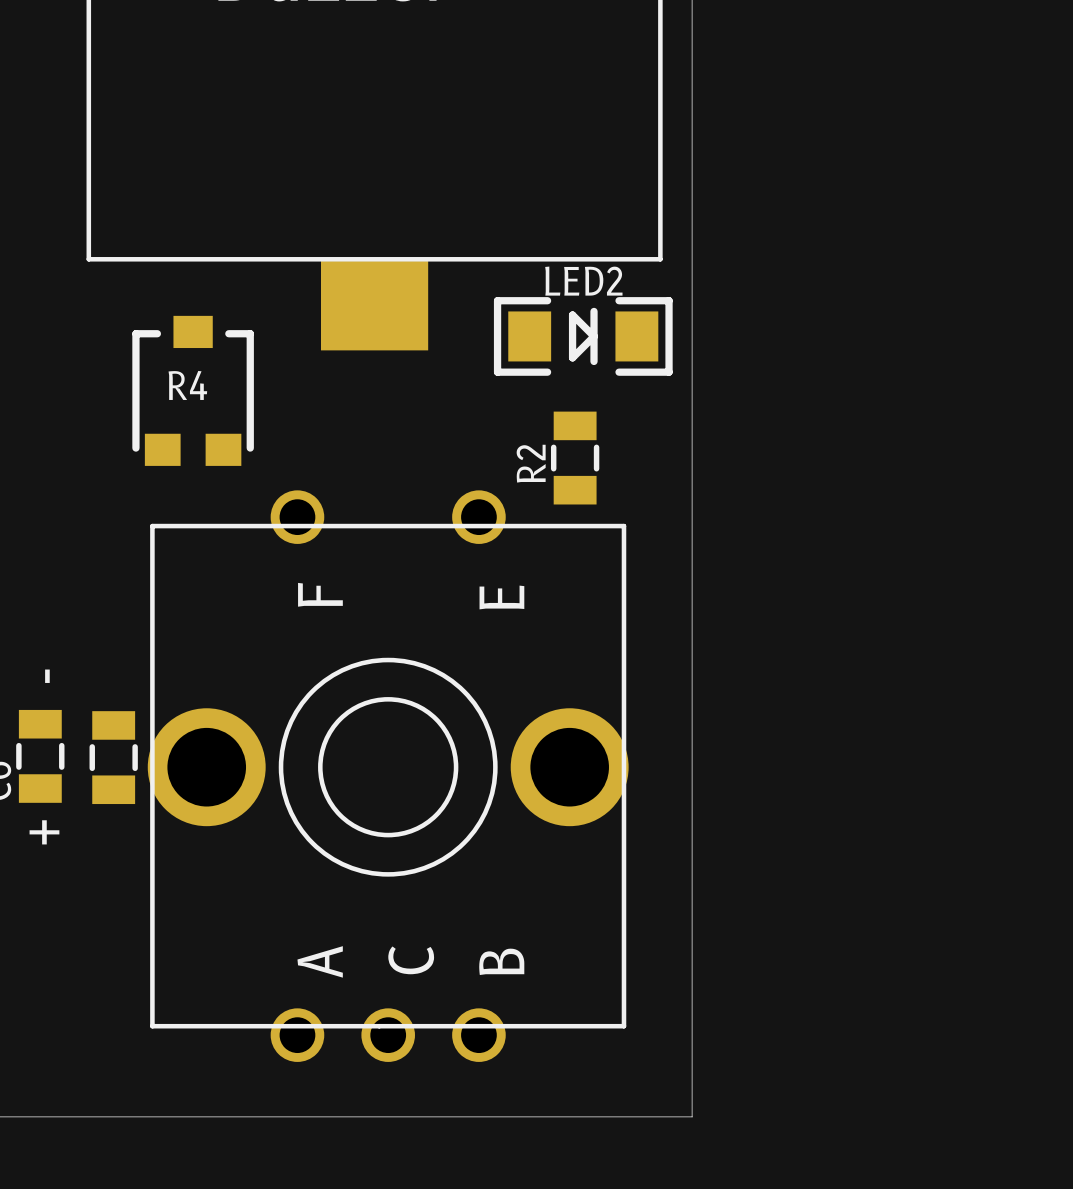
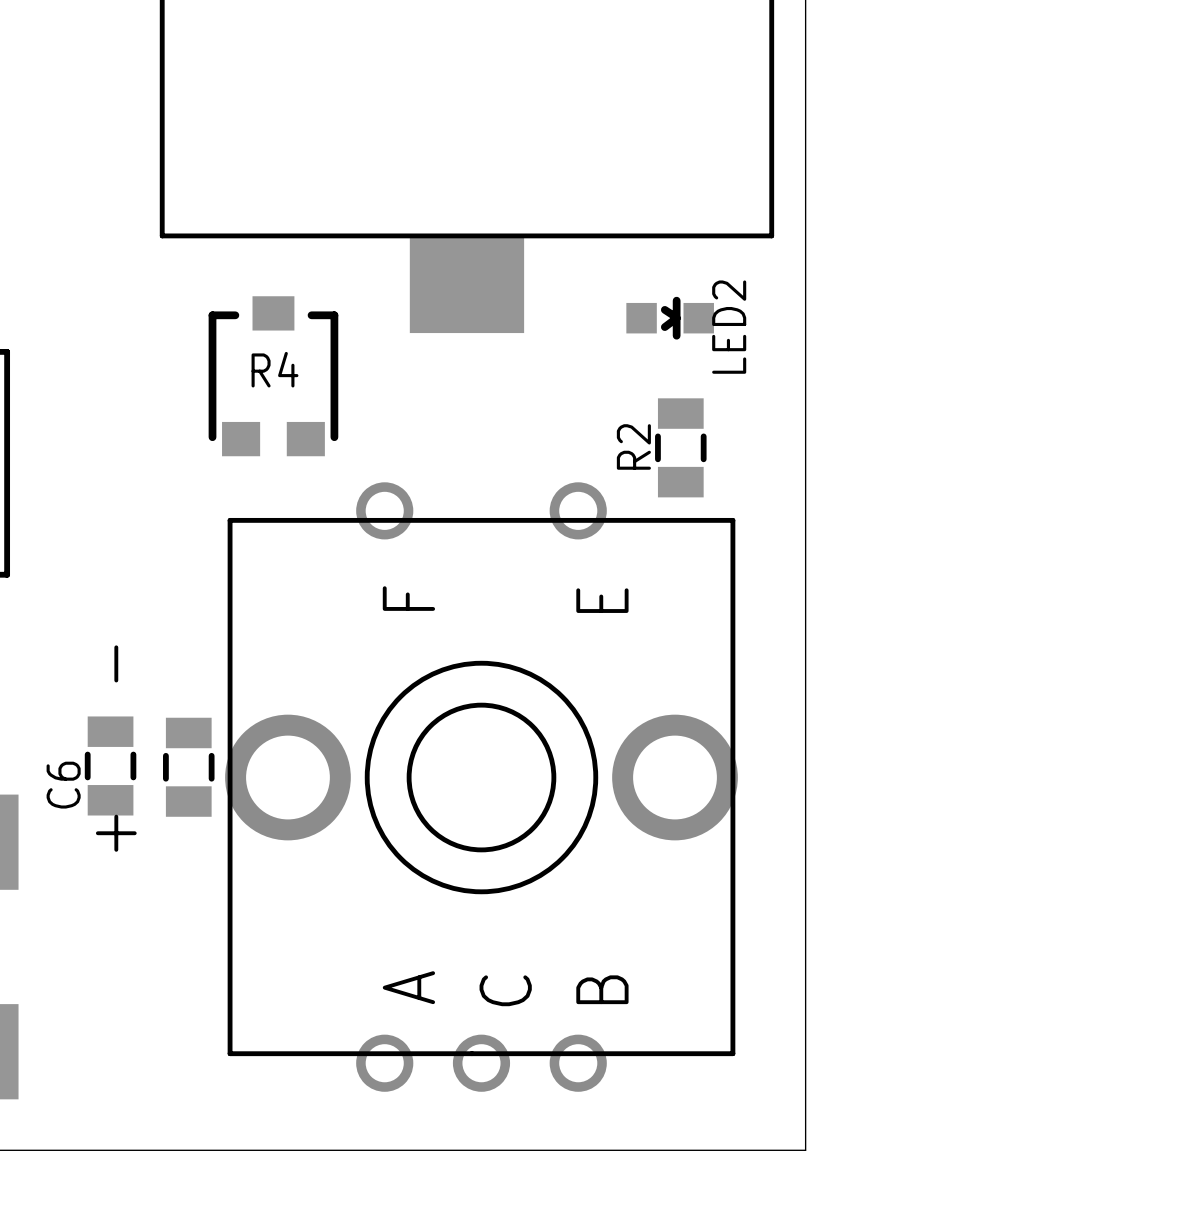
LED2 name position: LED2 (583, 281) -> LED2 (729, 327)
LED2 footprint: [493, 297, 673, 376] -> [626, 296, 714, 340]

